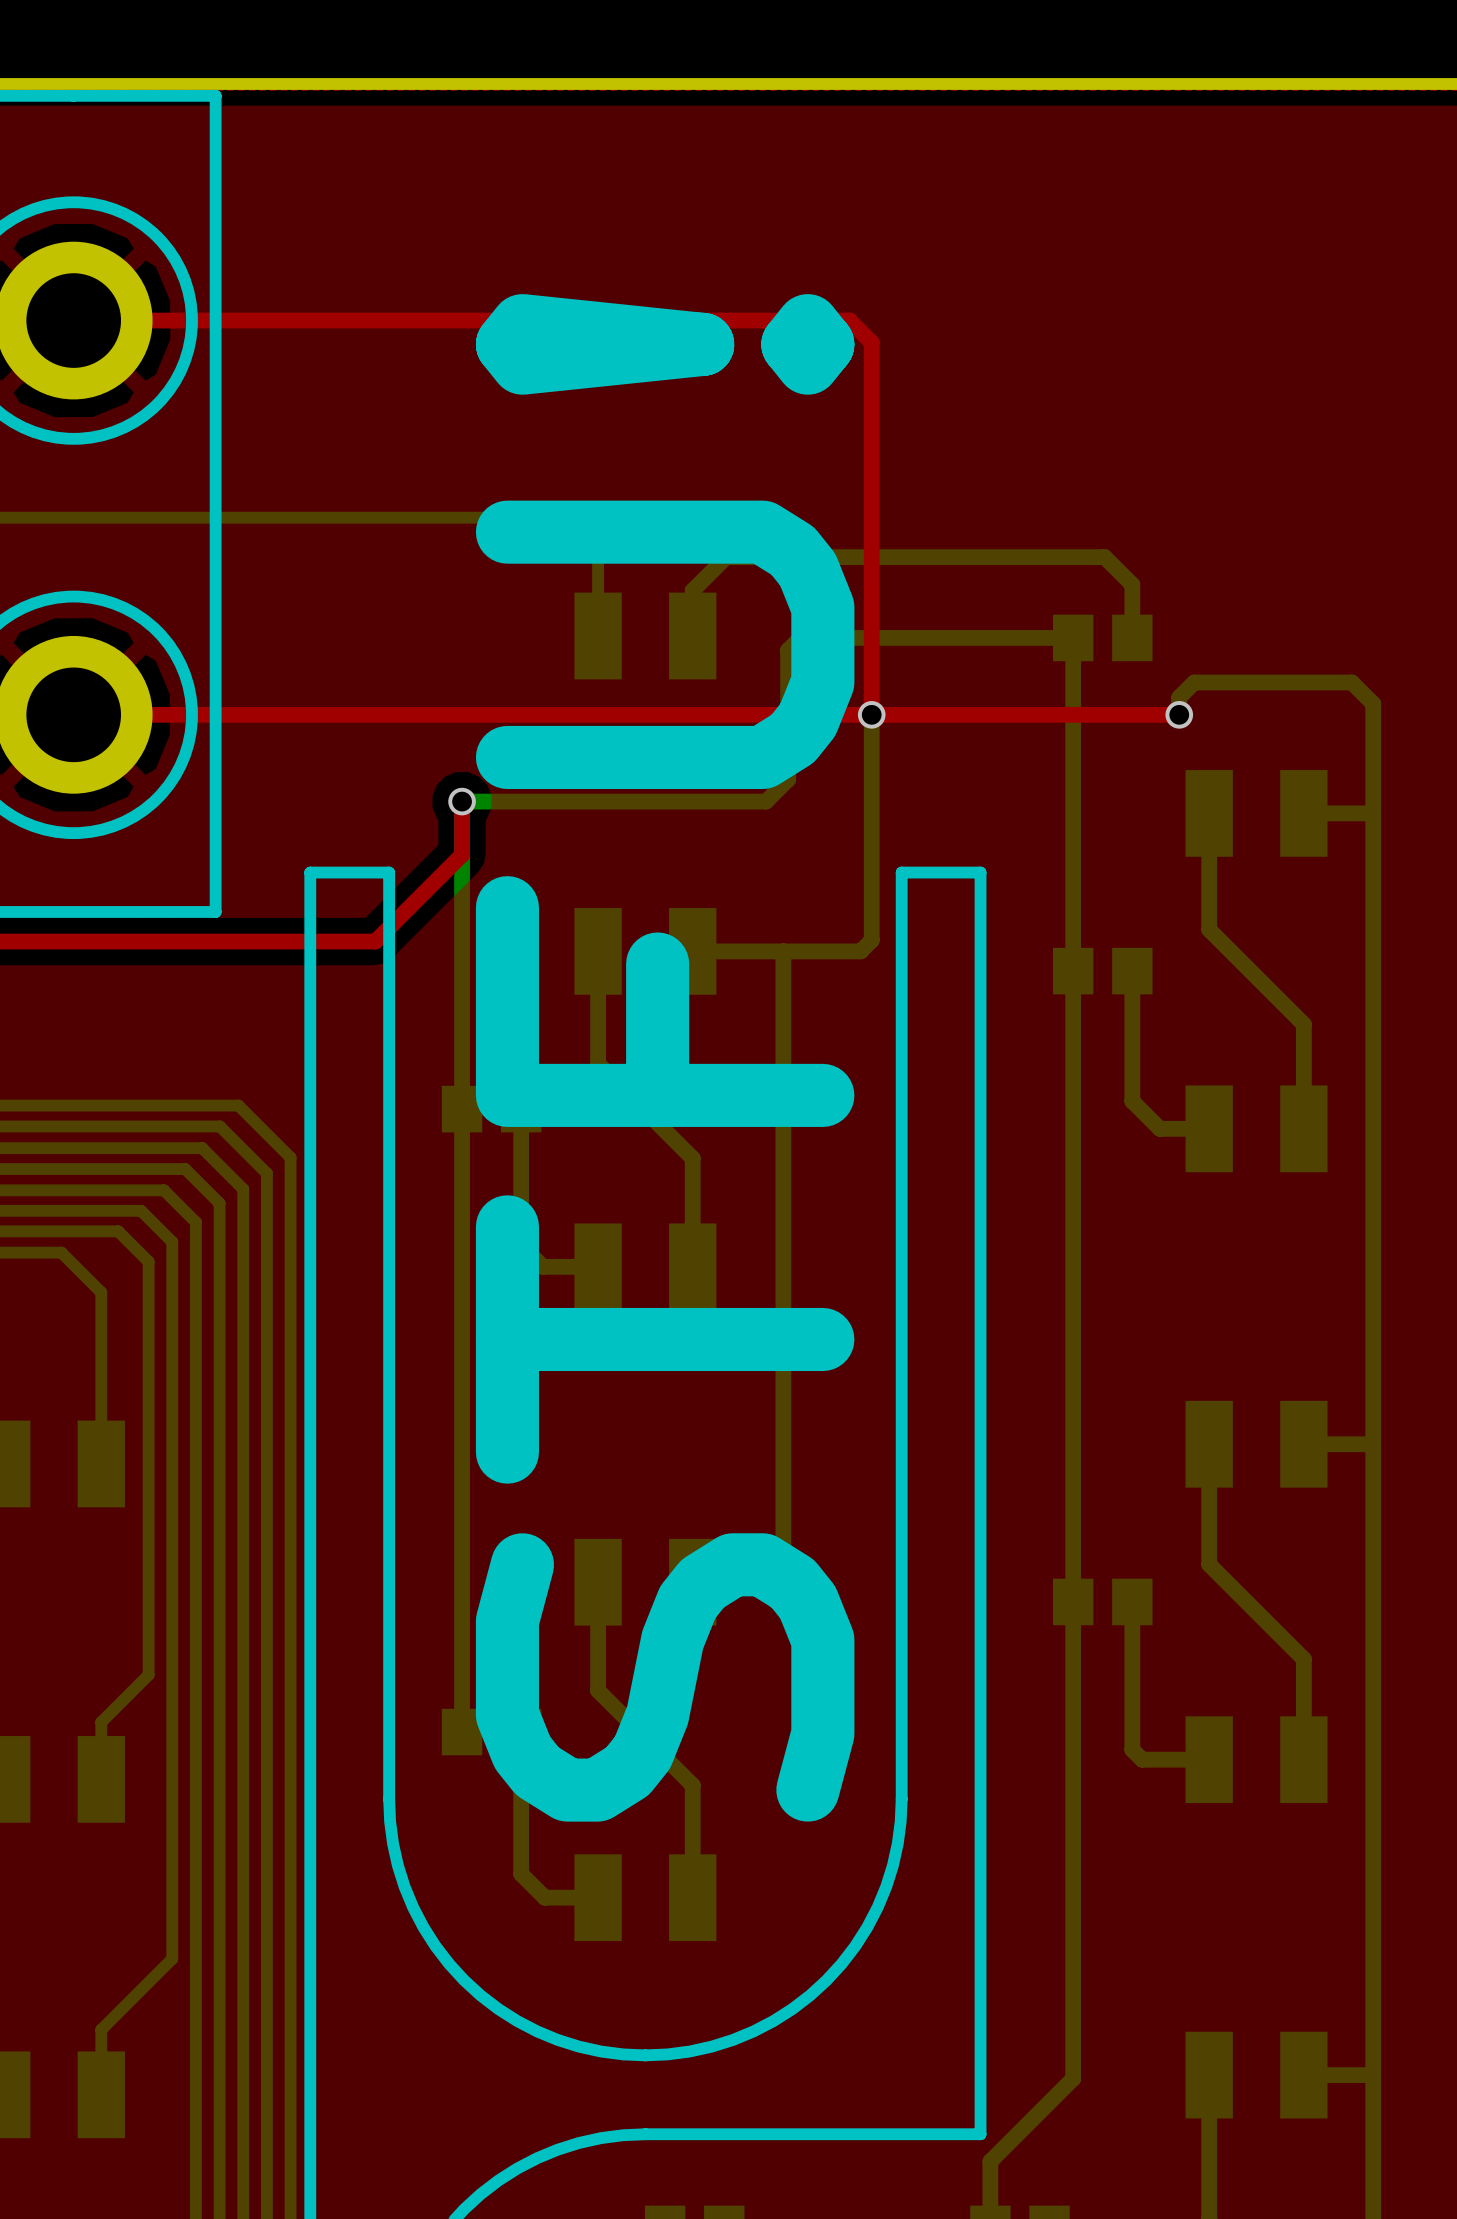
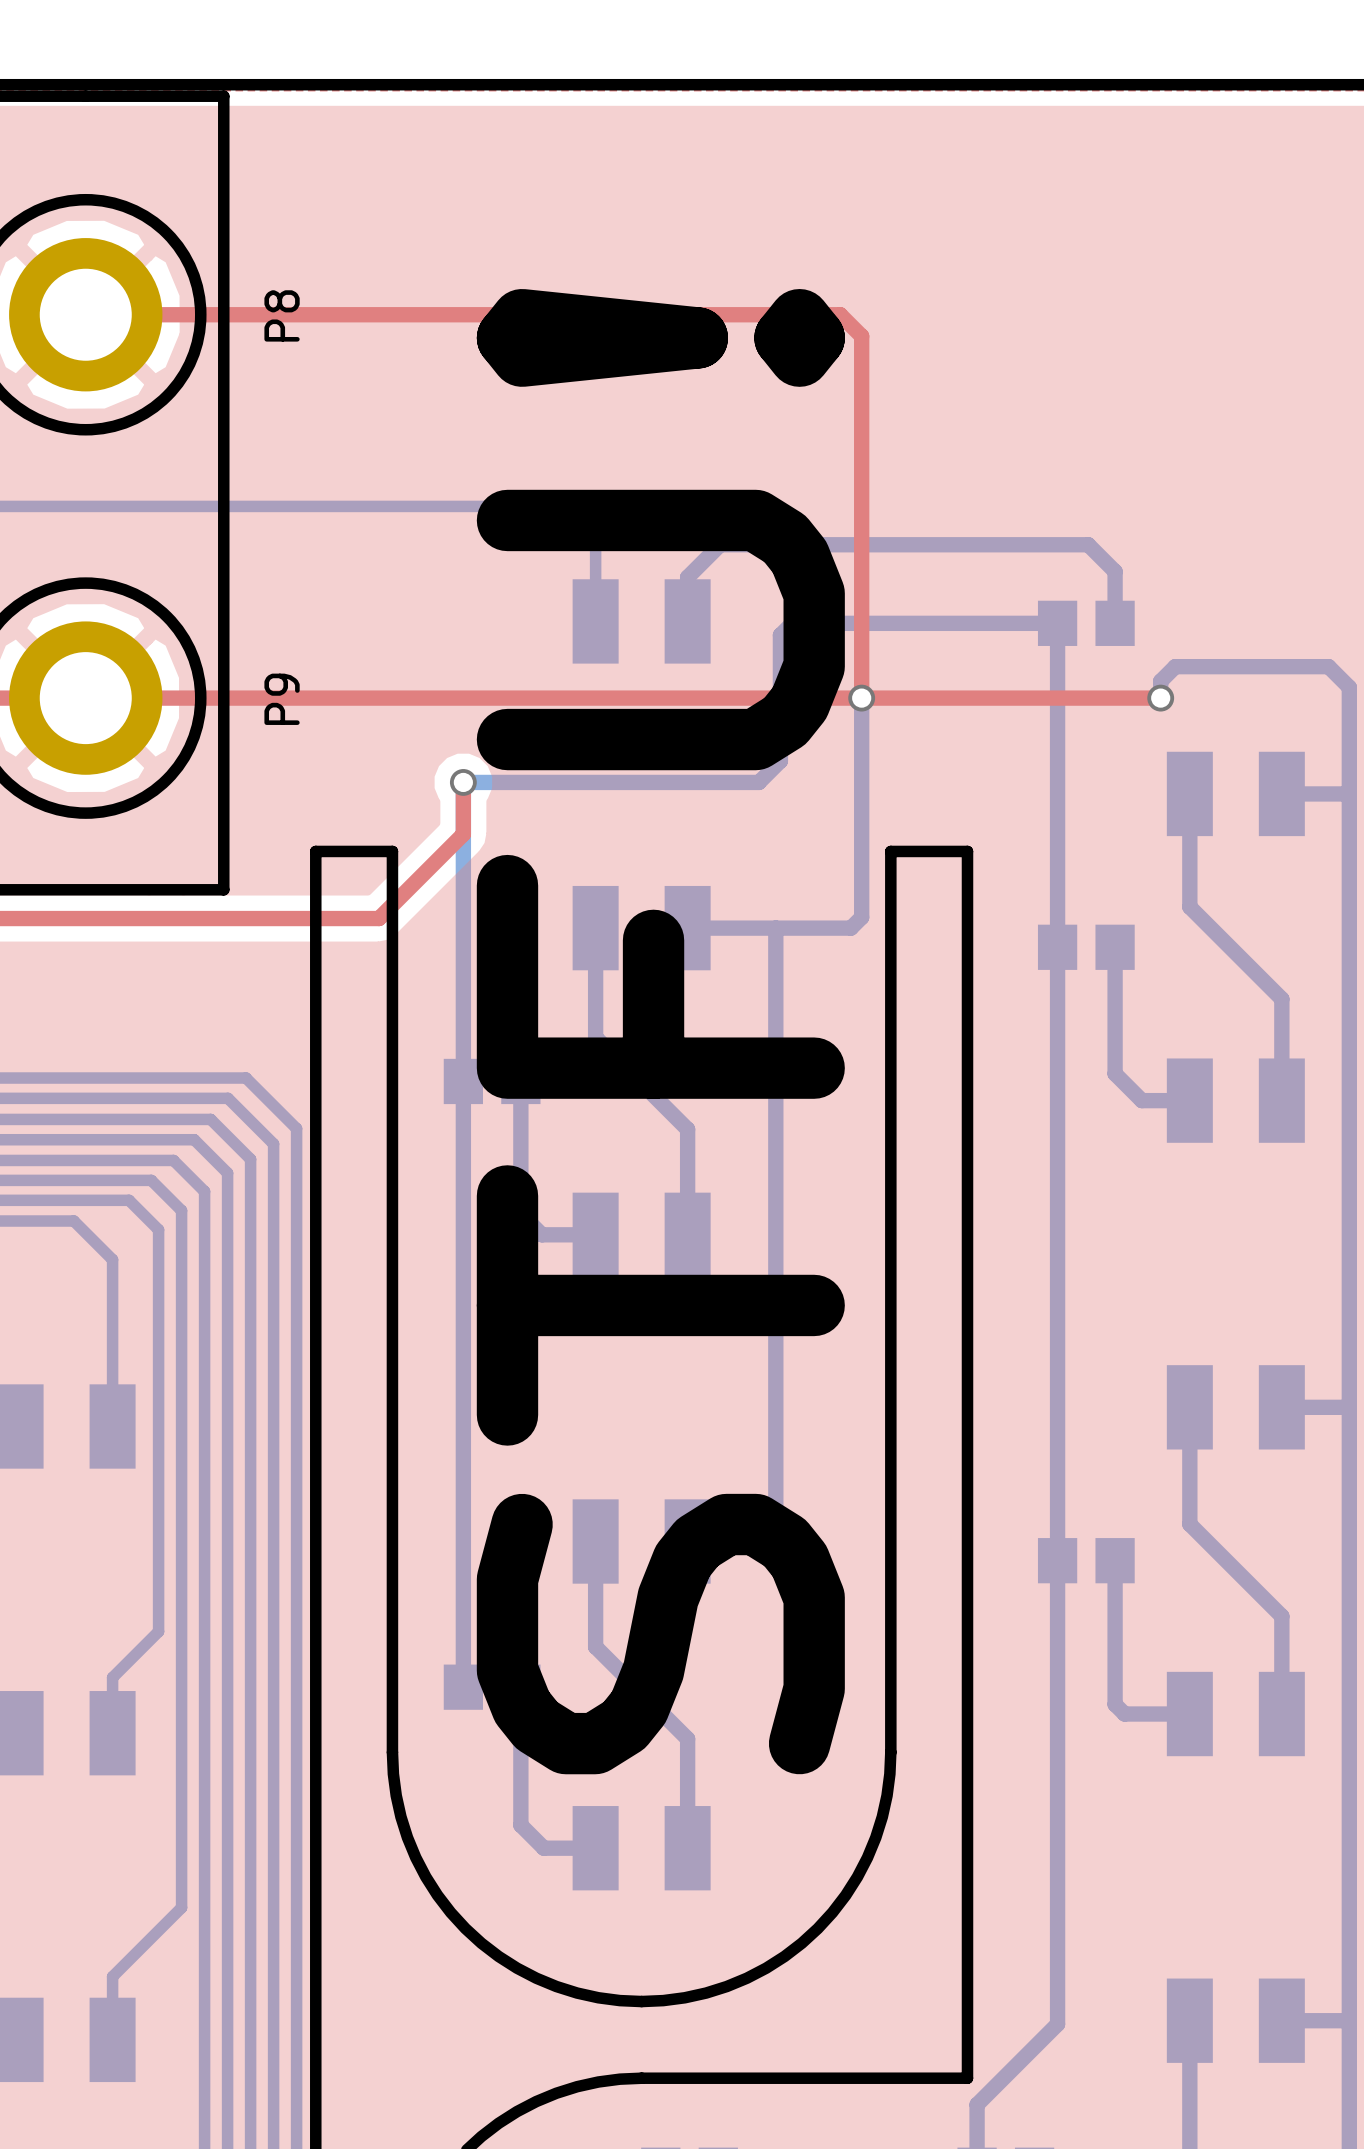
P8 name: none -> P8 (282, 315)
P9 name: none -> P9 (282, 699)

